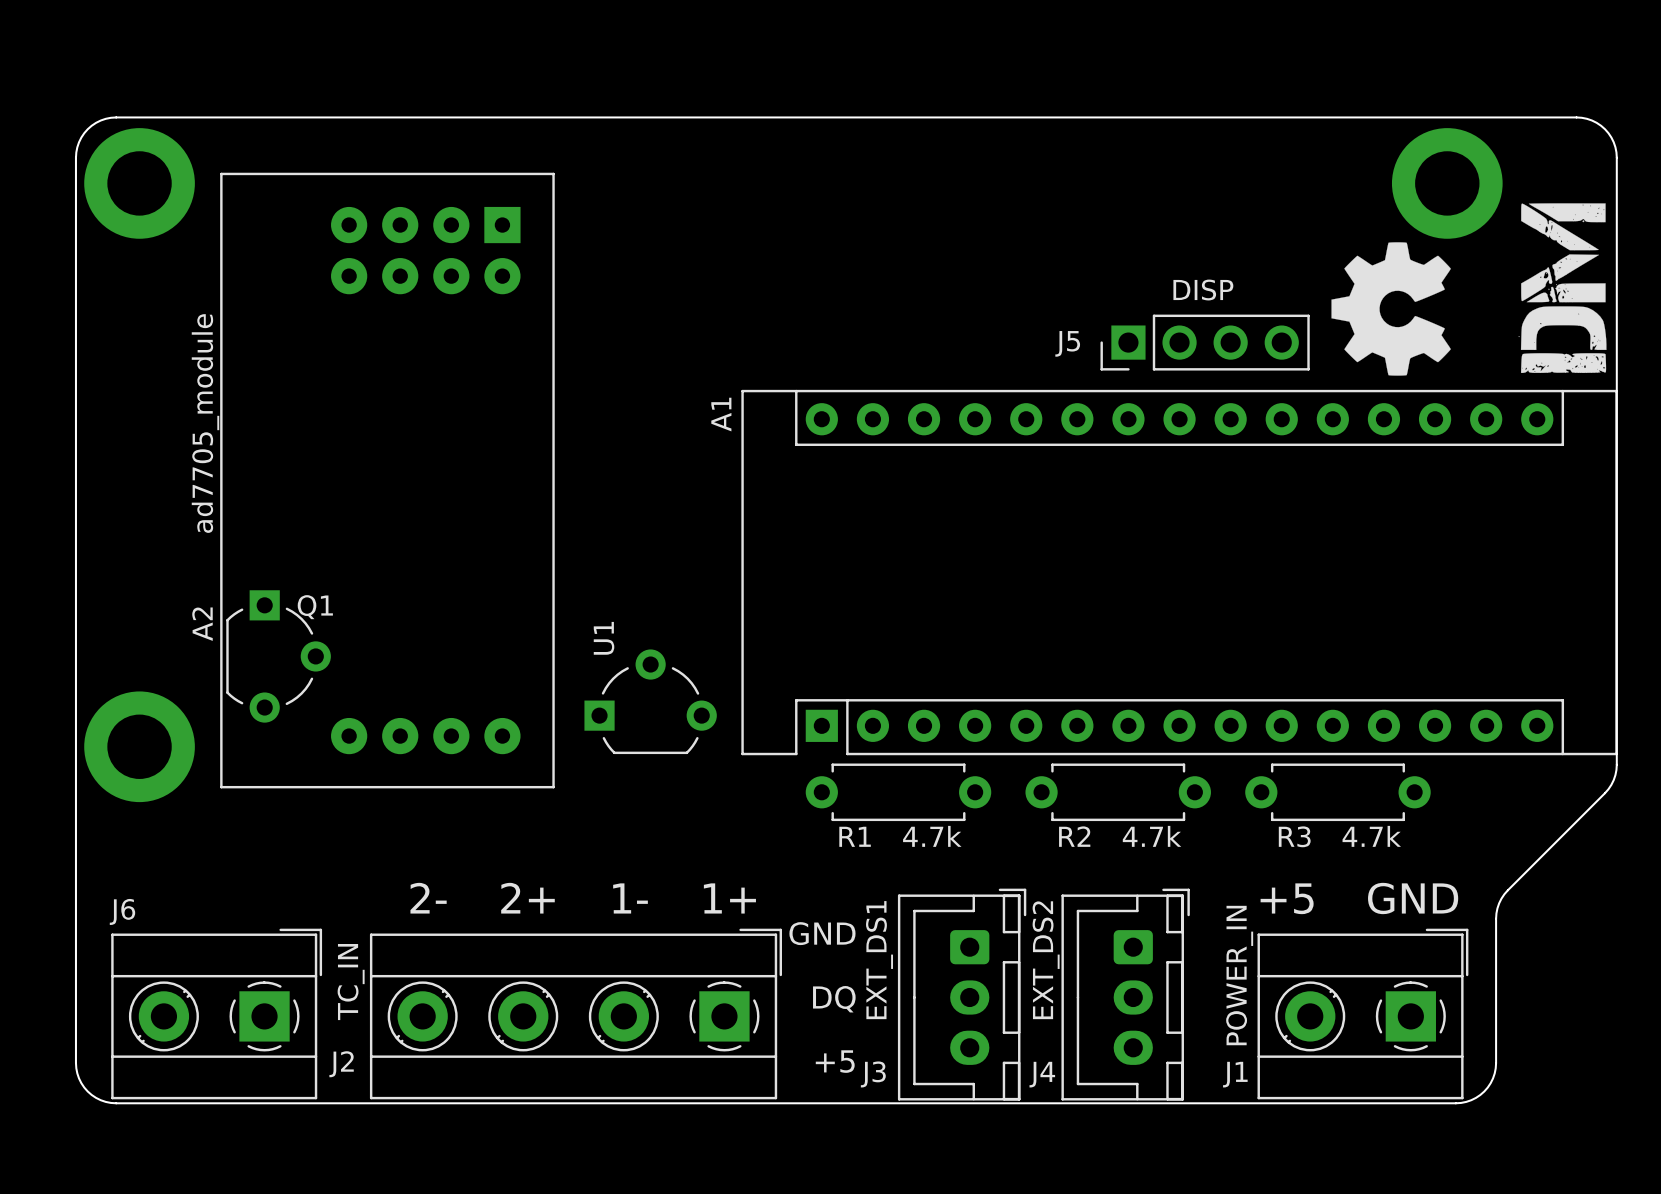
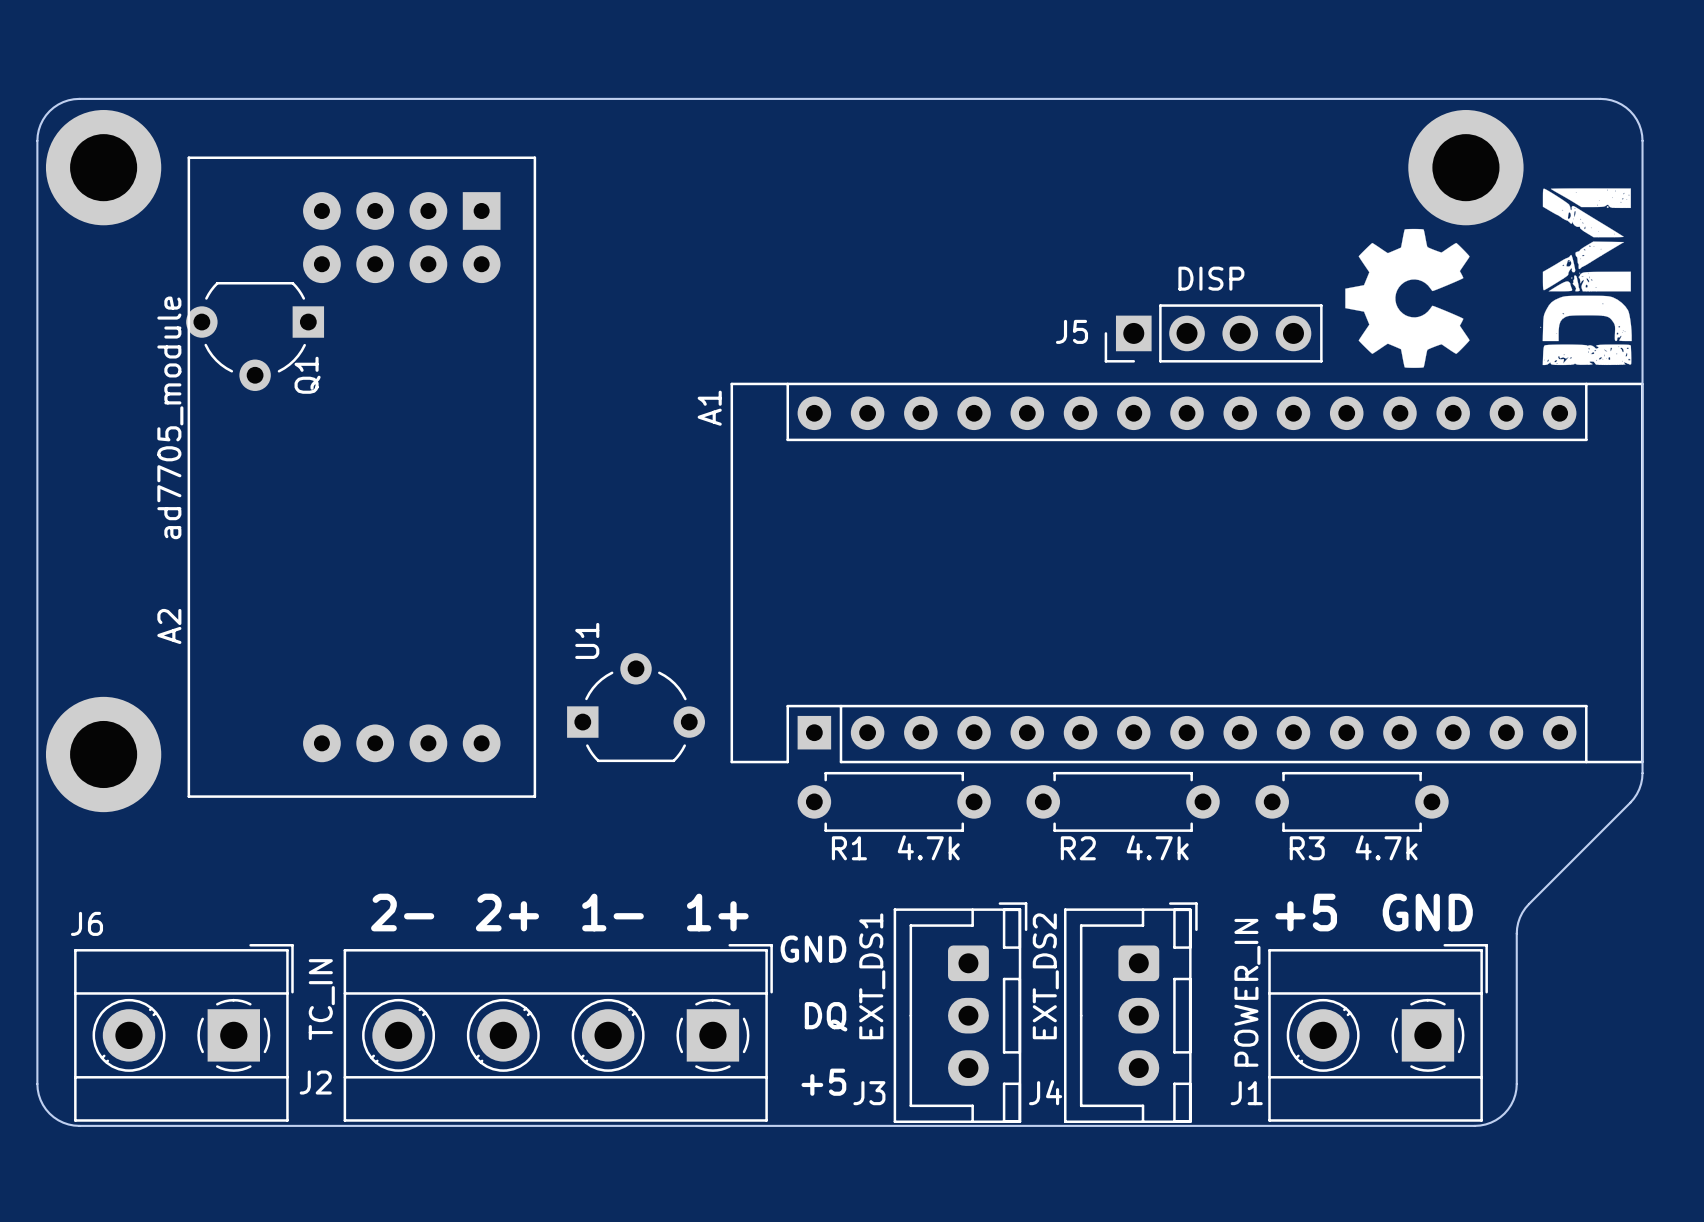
Q1 rotation: 0° (278, 656) -> 90° clockwise (255, 336)
Q1 position: (278, 656) -> (255, 336)

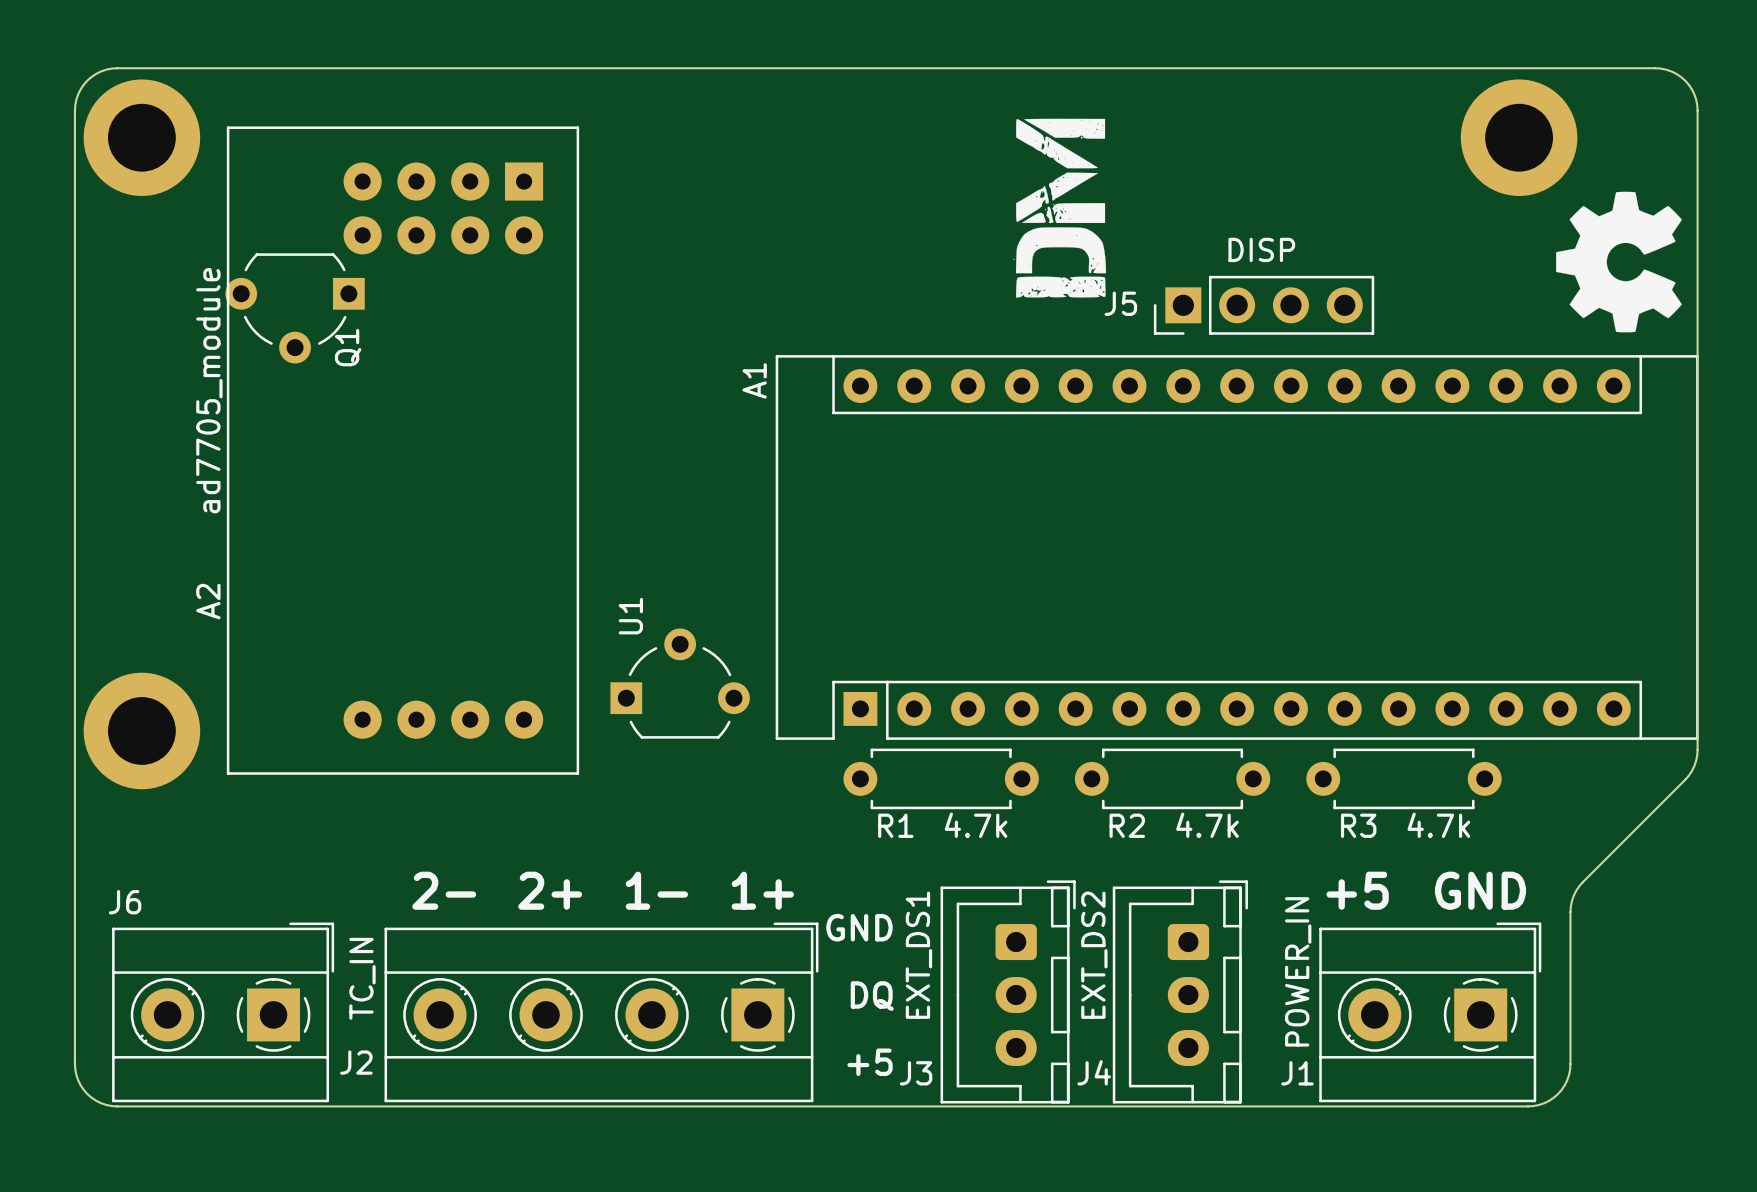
drawing: none -> [1013, 118, 1106, 298]
drawing: [1540, 188, 1632, 366] -> none
drawing position: (1407, 298) -> (1618, 262)

